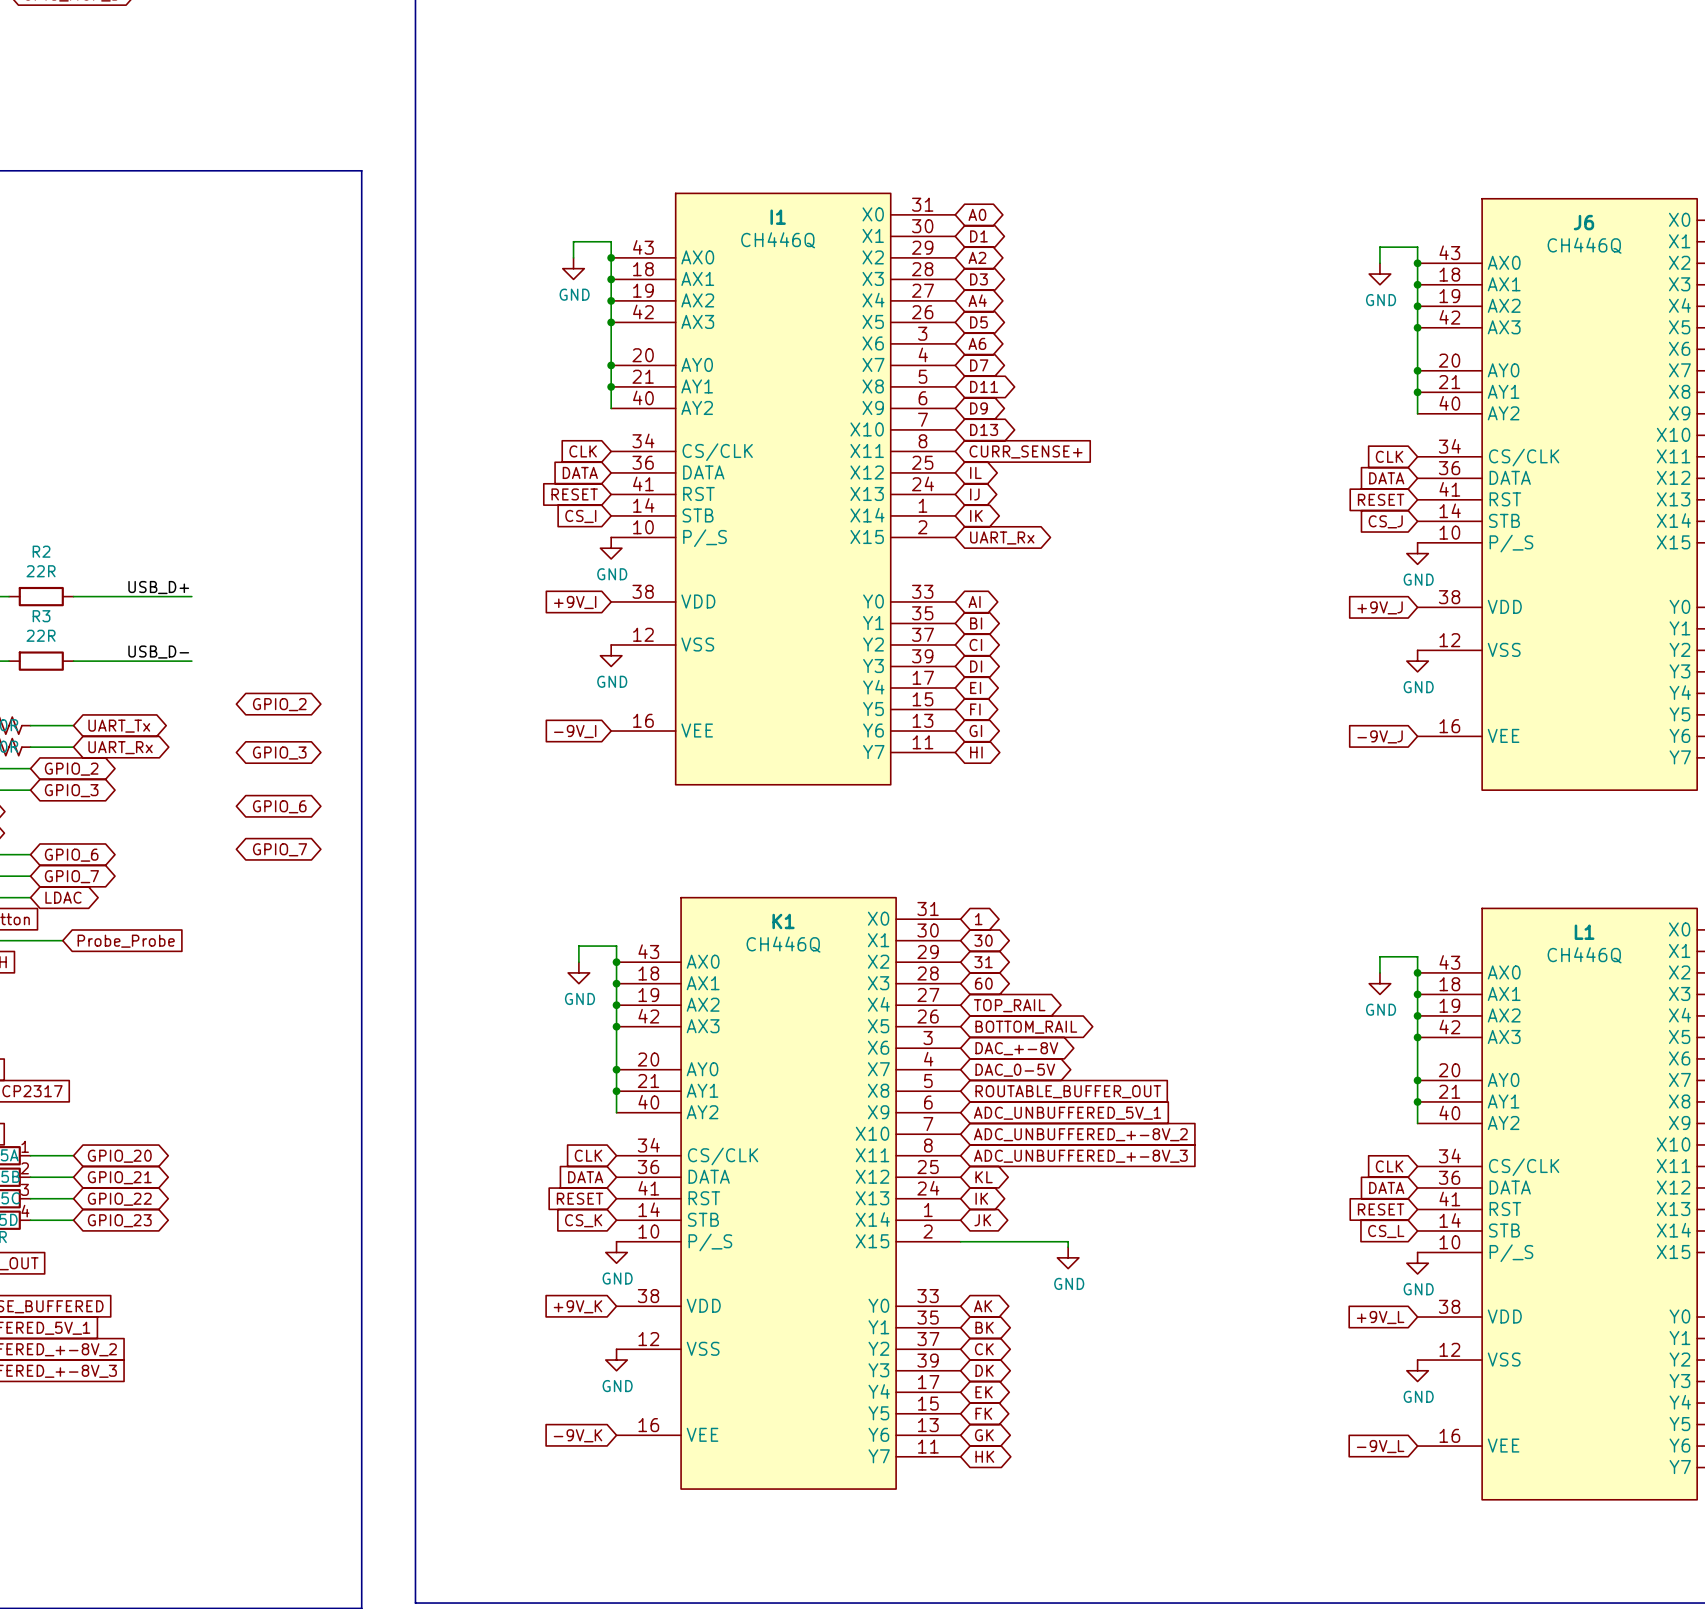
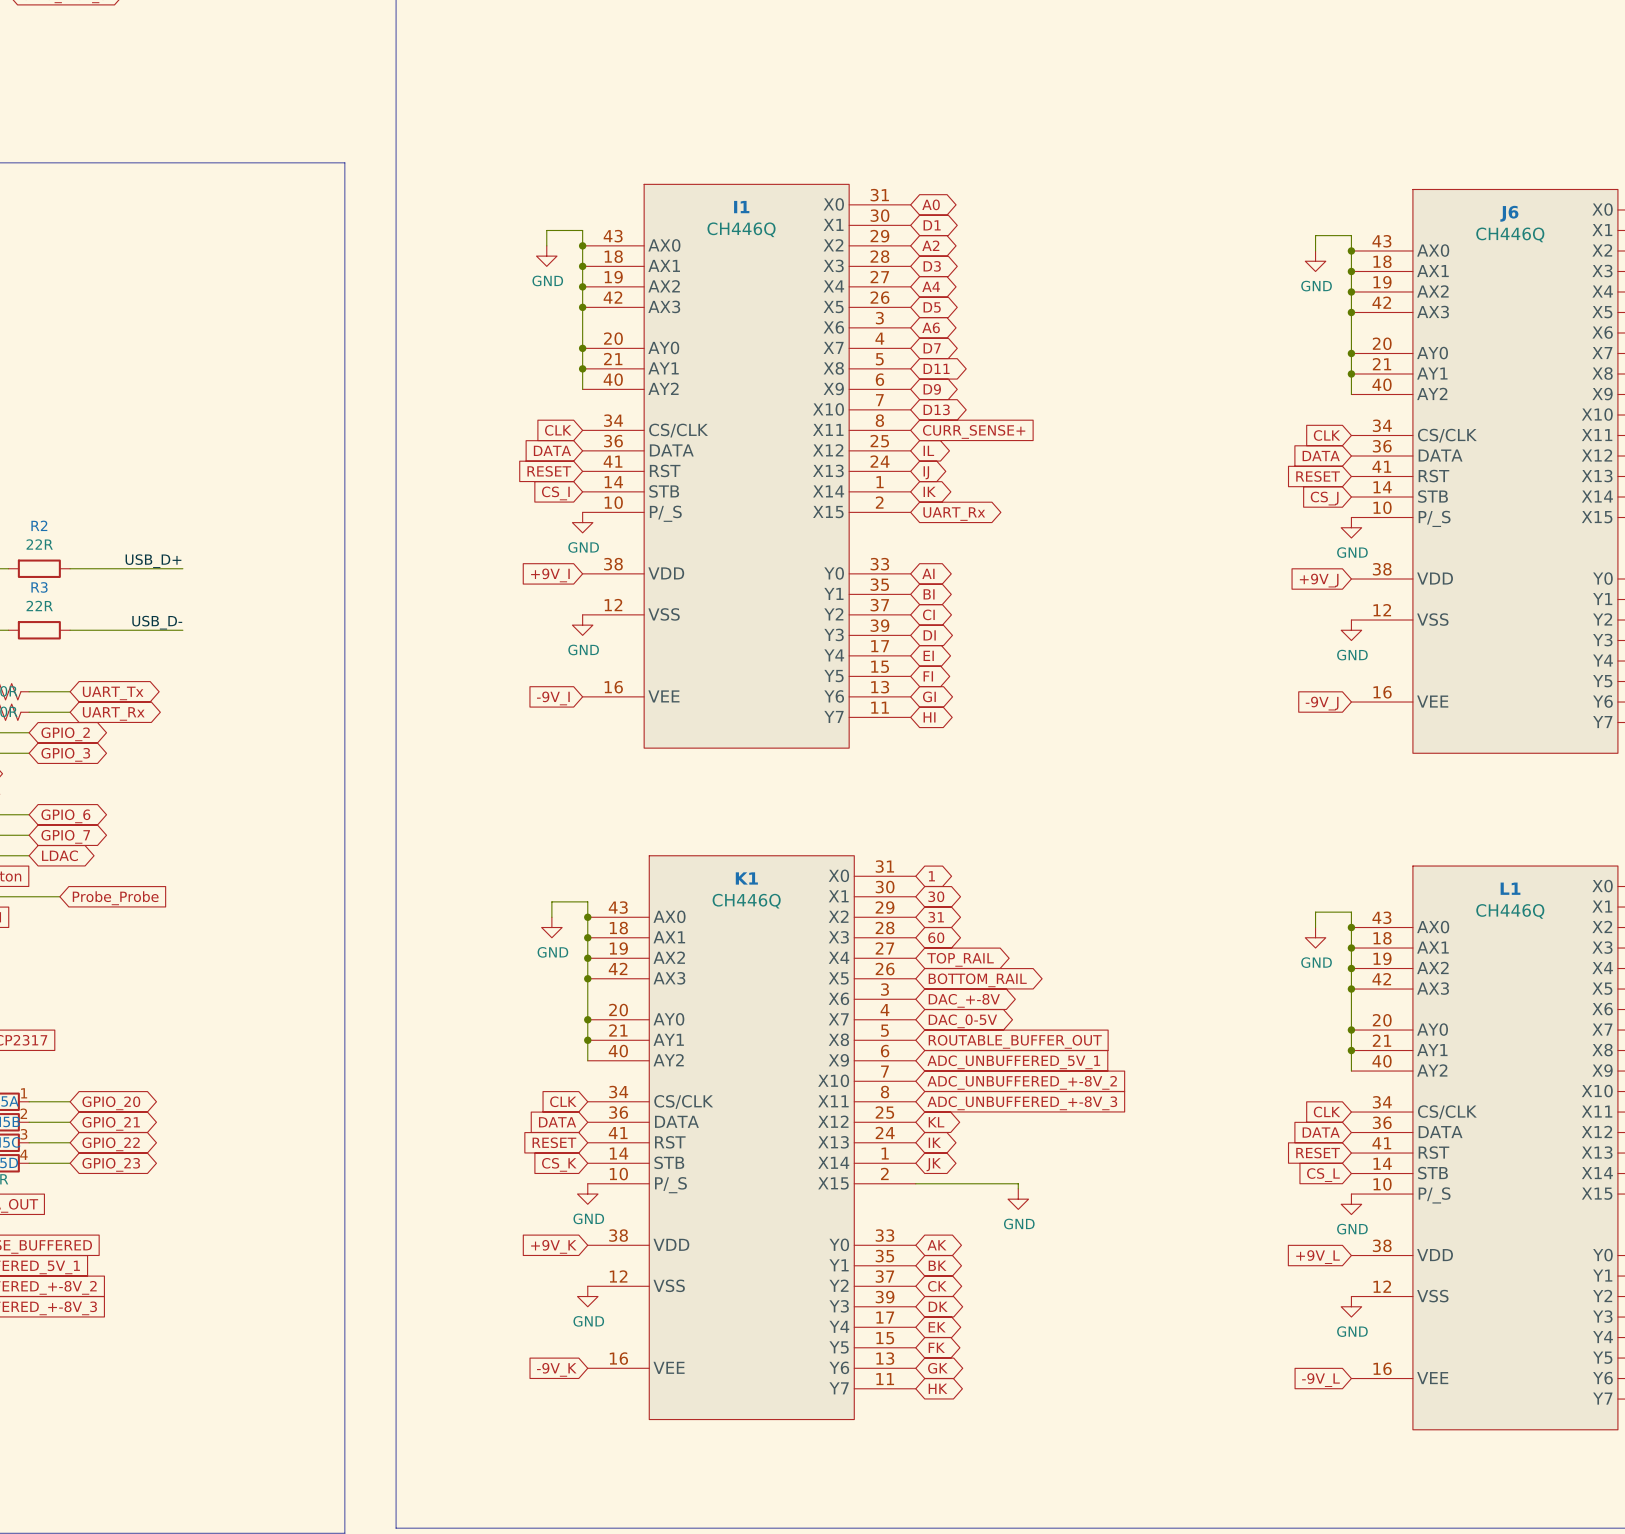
global label: GPIO_2 (279, 704) -> none
global label: GPIO_3 (279, 753) -> none
global label: GPIO_6 (279, 806) -> none
global label: GPIO_7 (280, 849) -> none

